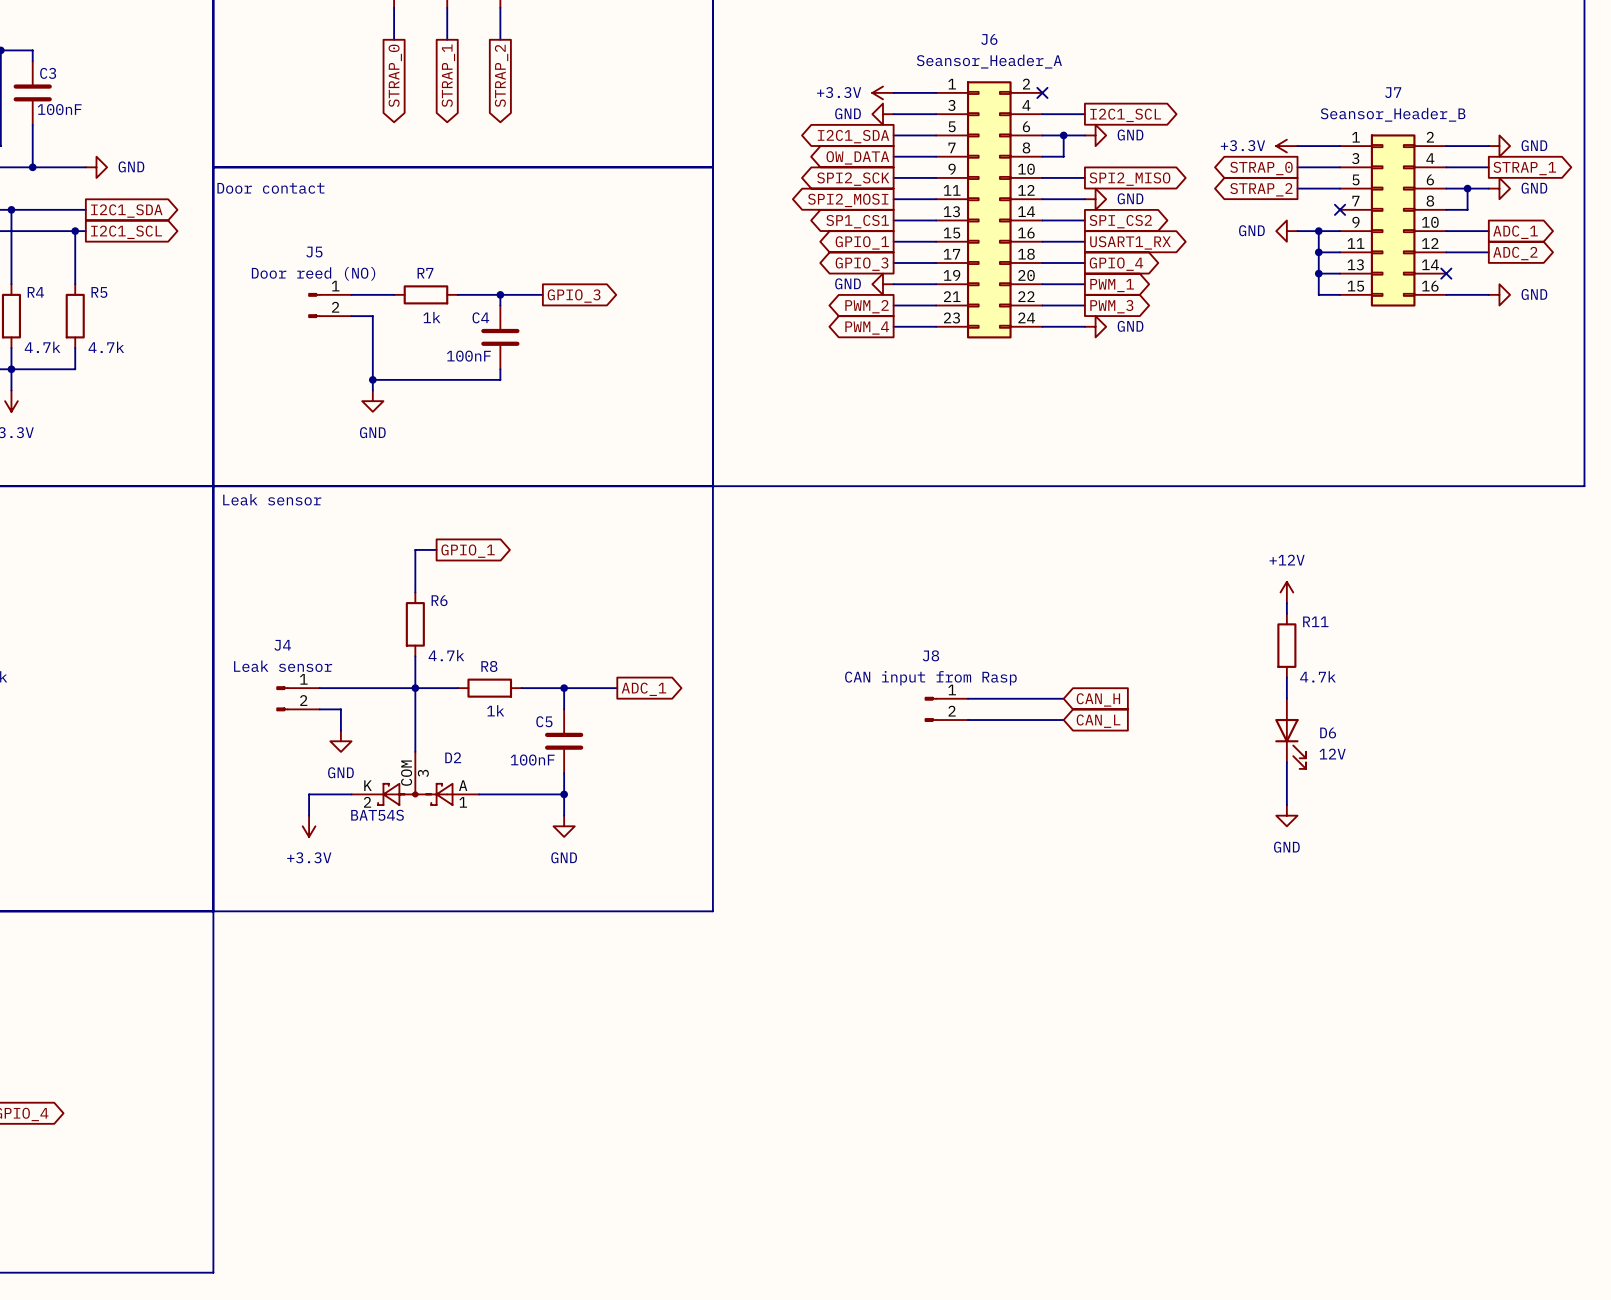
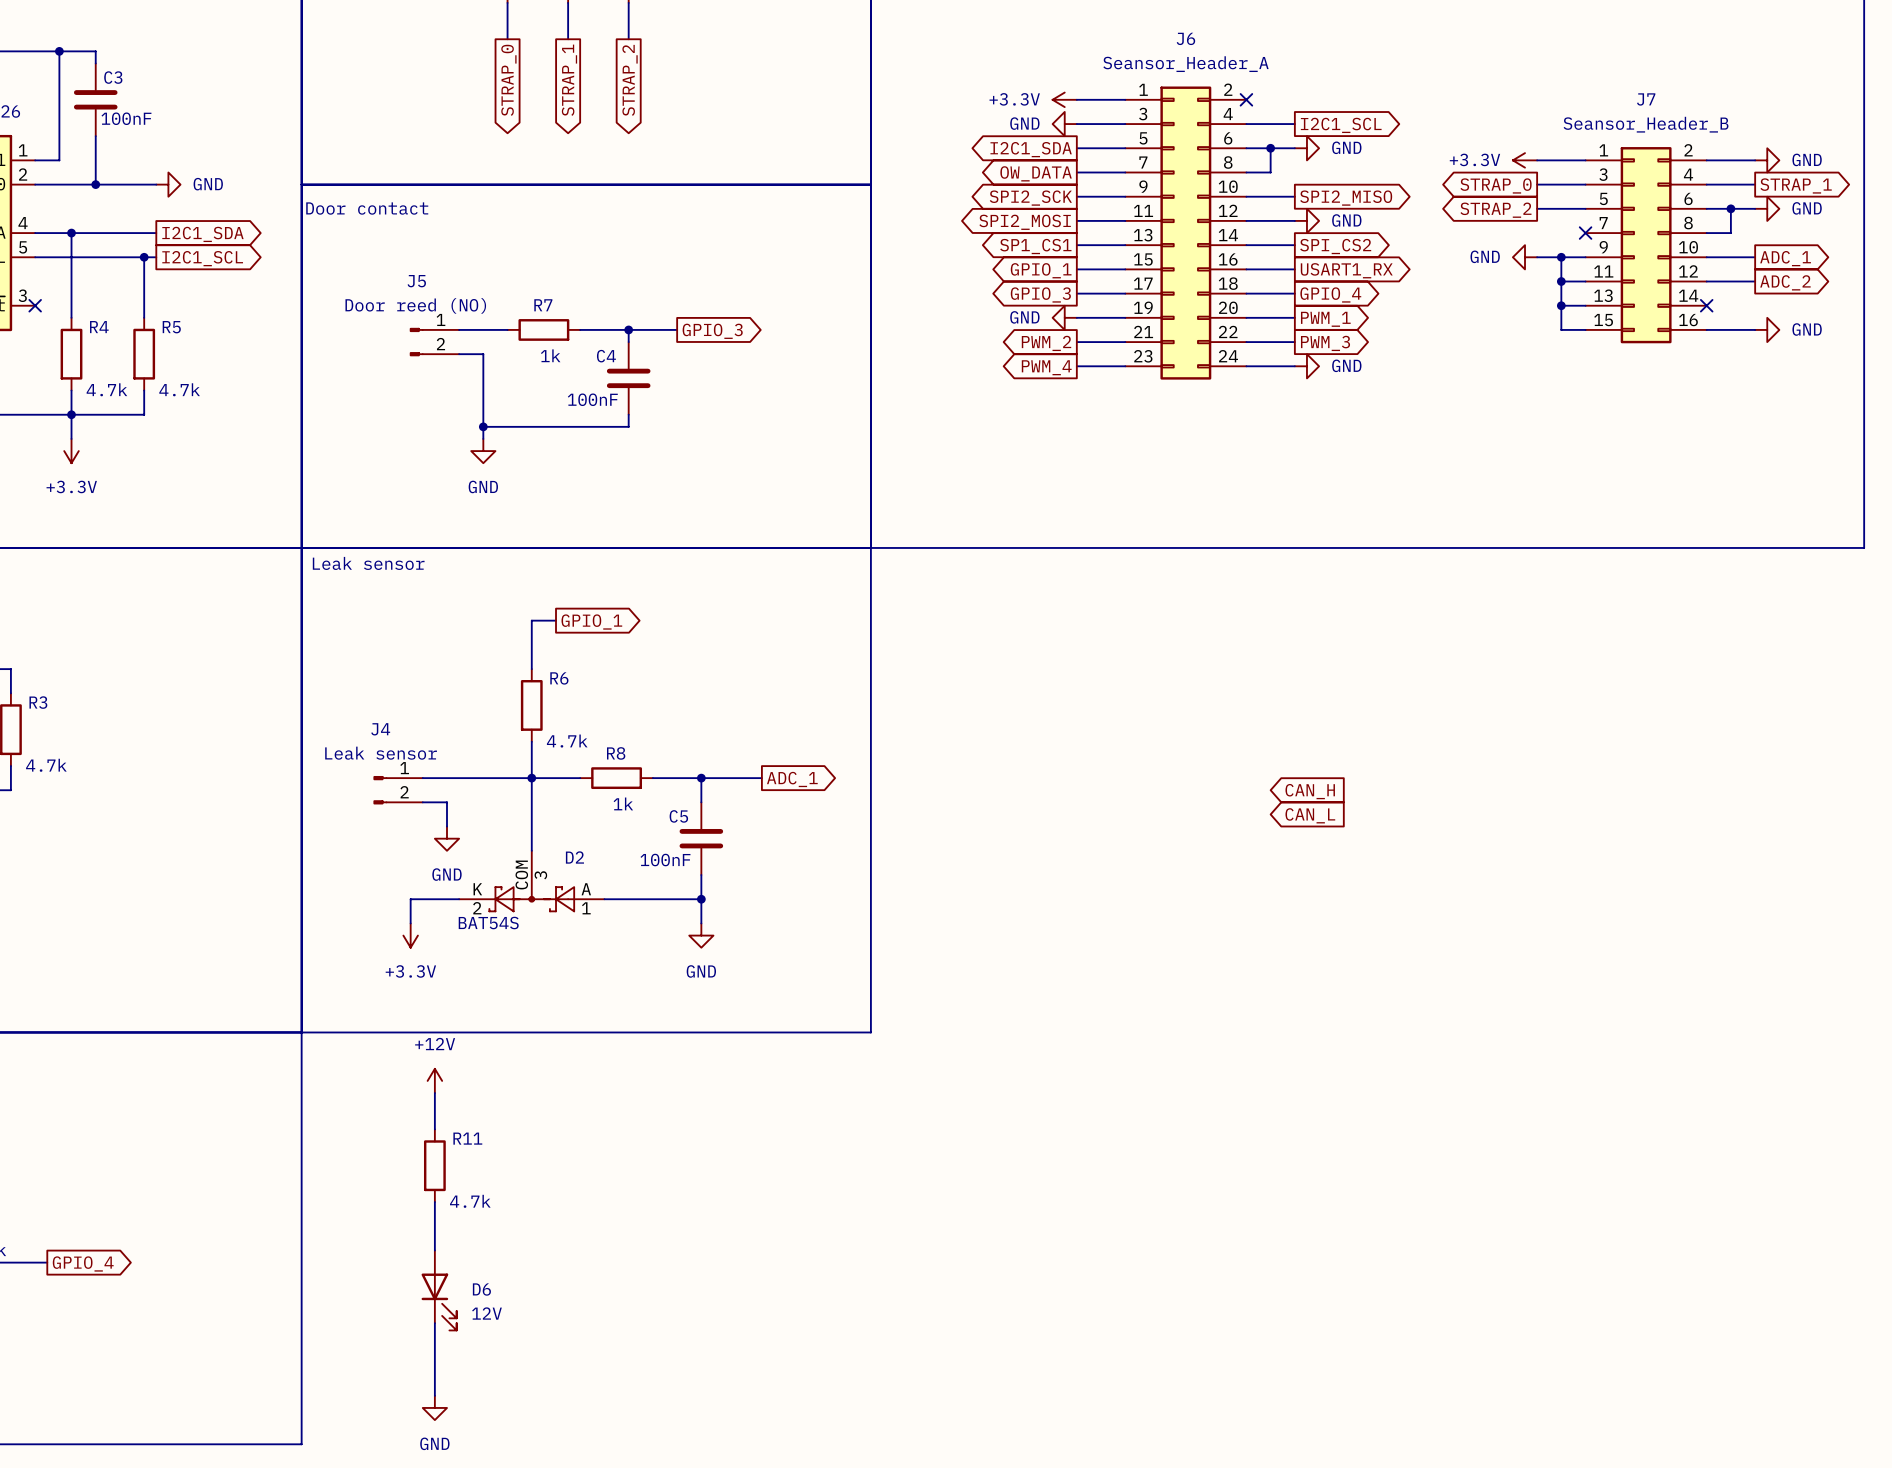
power symbol: +12V (1286, 592) -> none
wire: (1286, 603) (1286, 613) -> none
R11 position: (1286, 645) -> (434, 1165)
wire: (1286, 677) (1286, 698) -> none
wire: (968, 698) (1063, 698) -> none
J8: CAN input from Rasp (946, 709) -> none
wire: (968, 720) (1063, 720) -> none
D6 position: (1290, 733) -> (439, 1290)
wire: (1286, 762) (1286, 805) -> none
power symbol: GND (1286, 815) -> none
power symbol: none -> +12V (434, 1080)
wire: none -> (434, 1093) (434, 1129)
wire: none -> (434, 1202) (434, 1250)
wire: none -> (434, 1323) (434, 1395)
power symbol: none -> GND (434, 1407)

